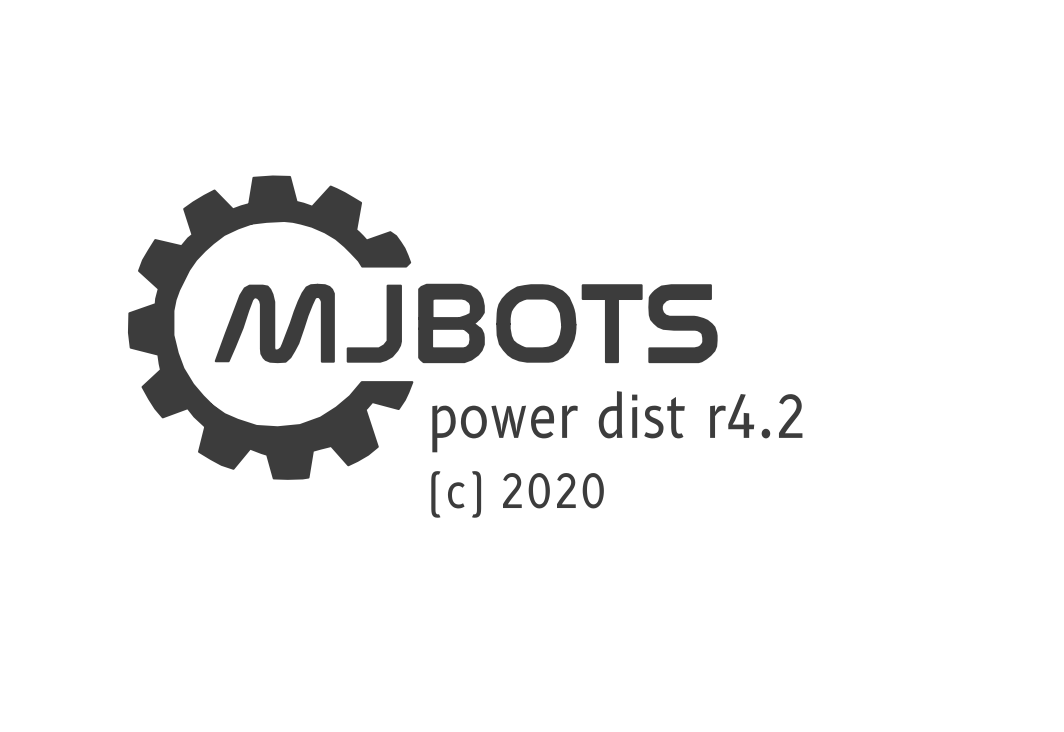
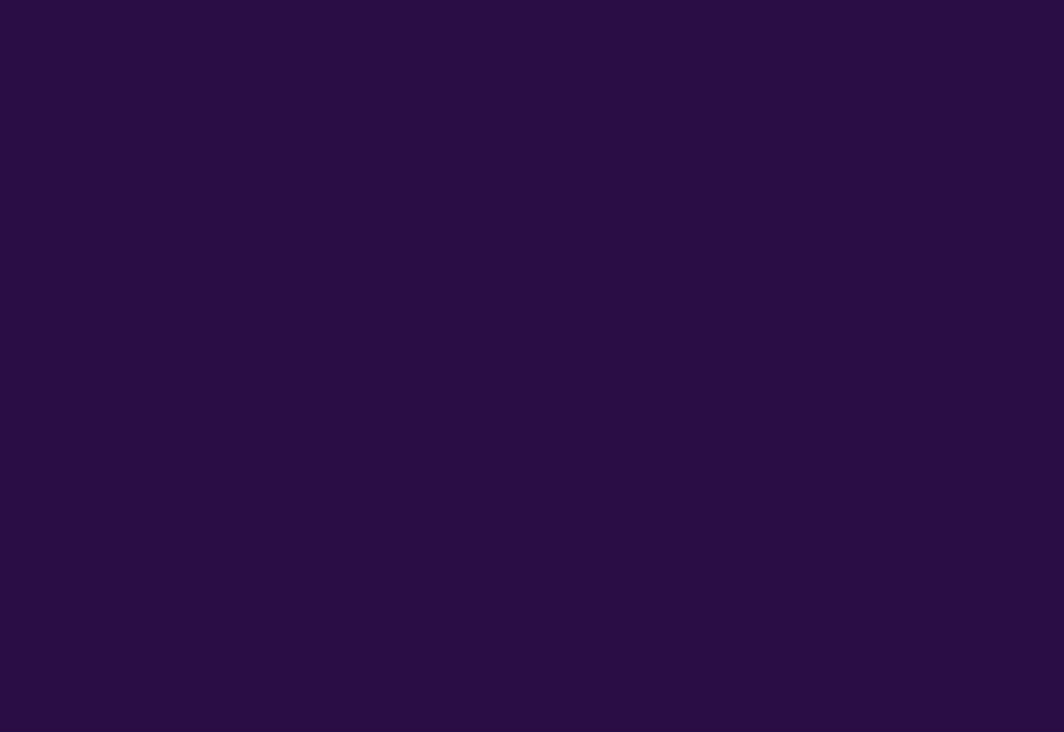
drawing: [127, 175, 718, 480] -> none
text: power dist r4.2 (617, 421) -> none
text: (c) 2020 (517, 494) -> none

